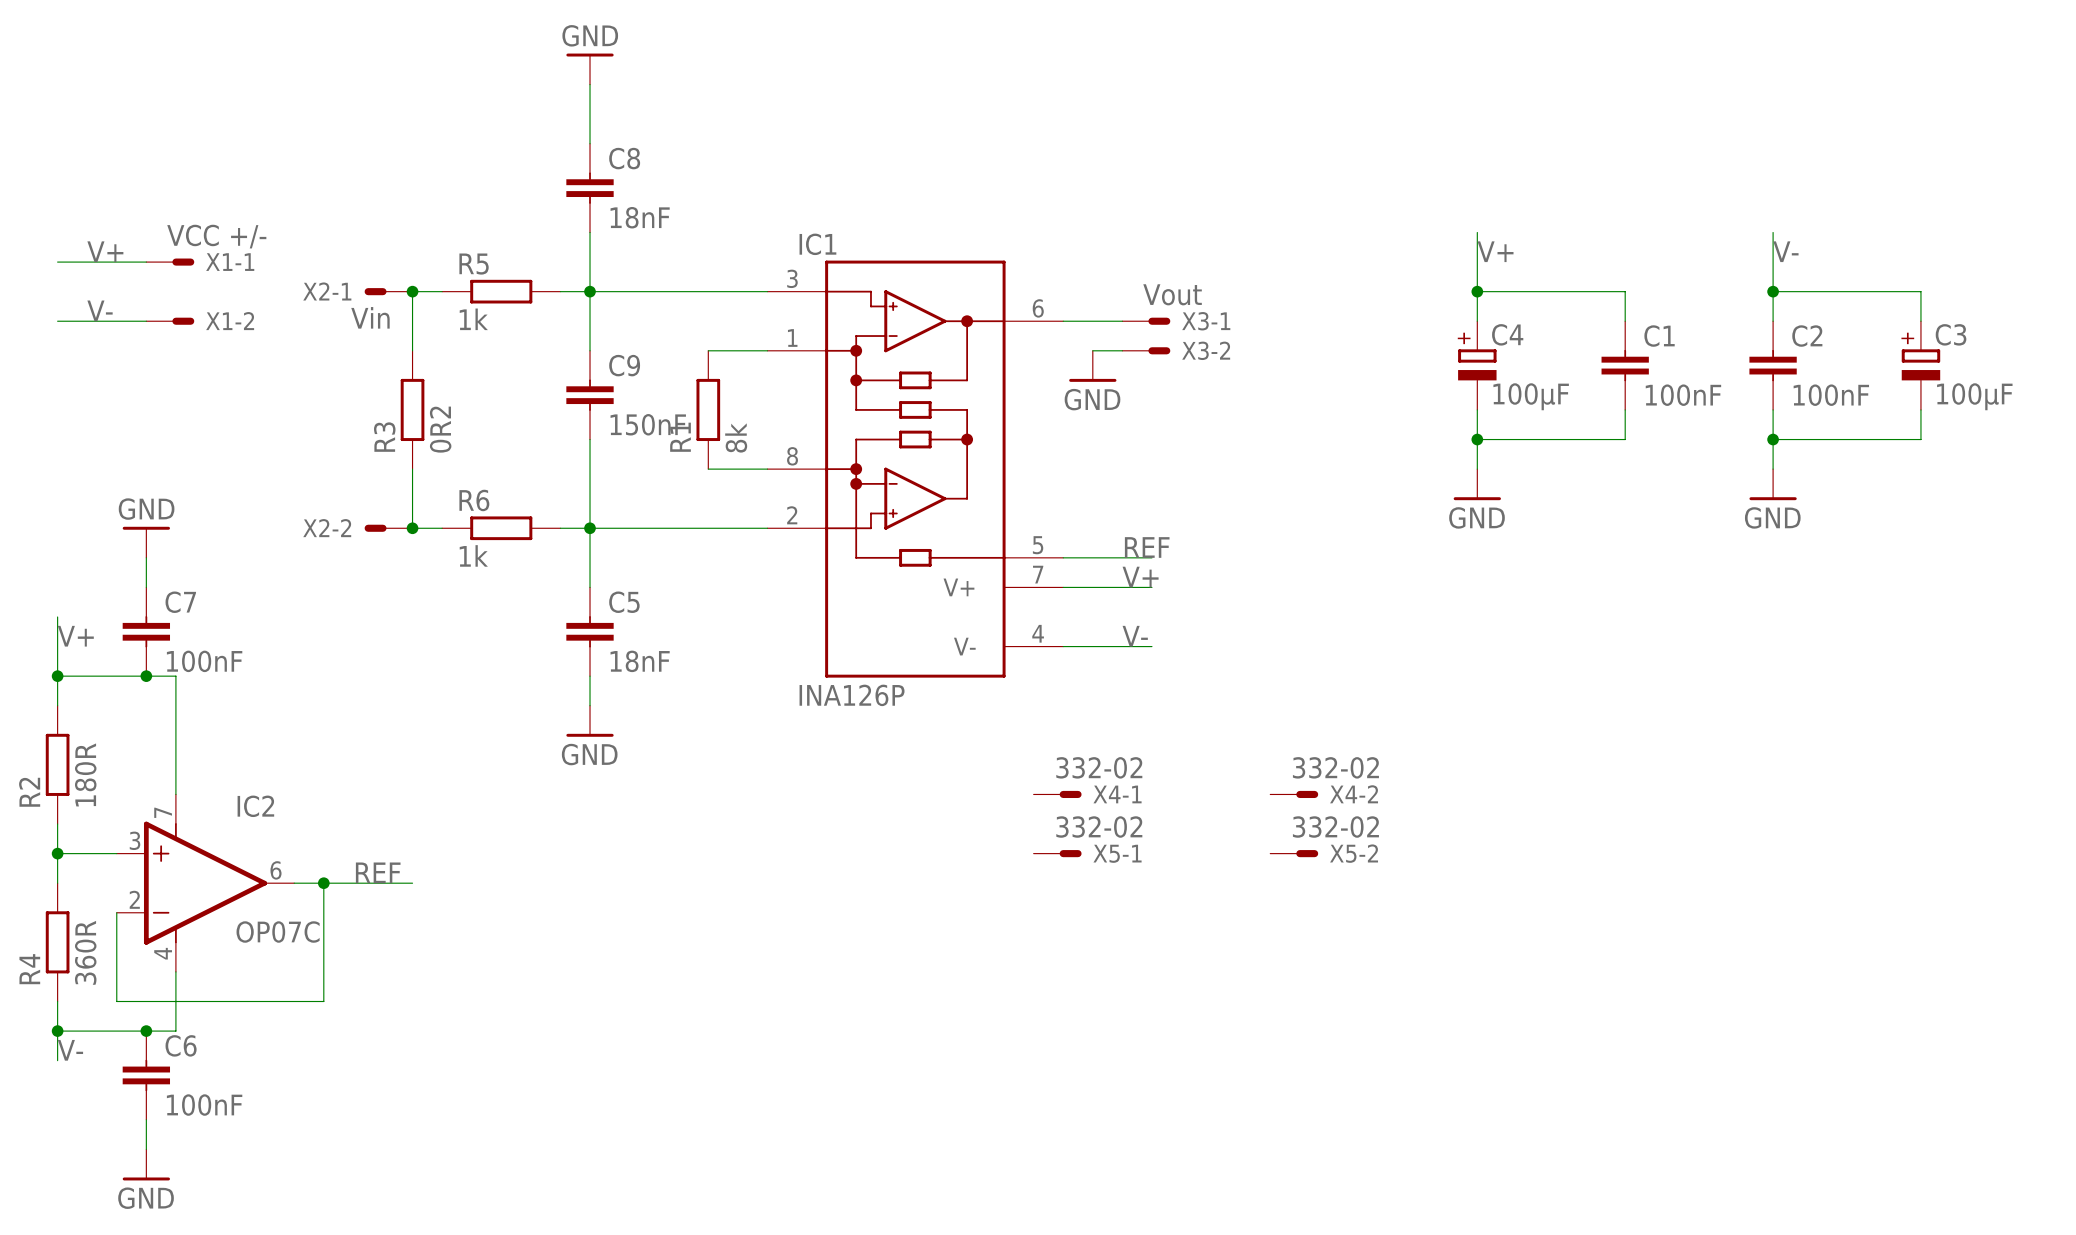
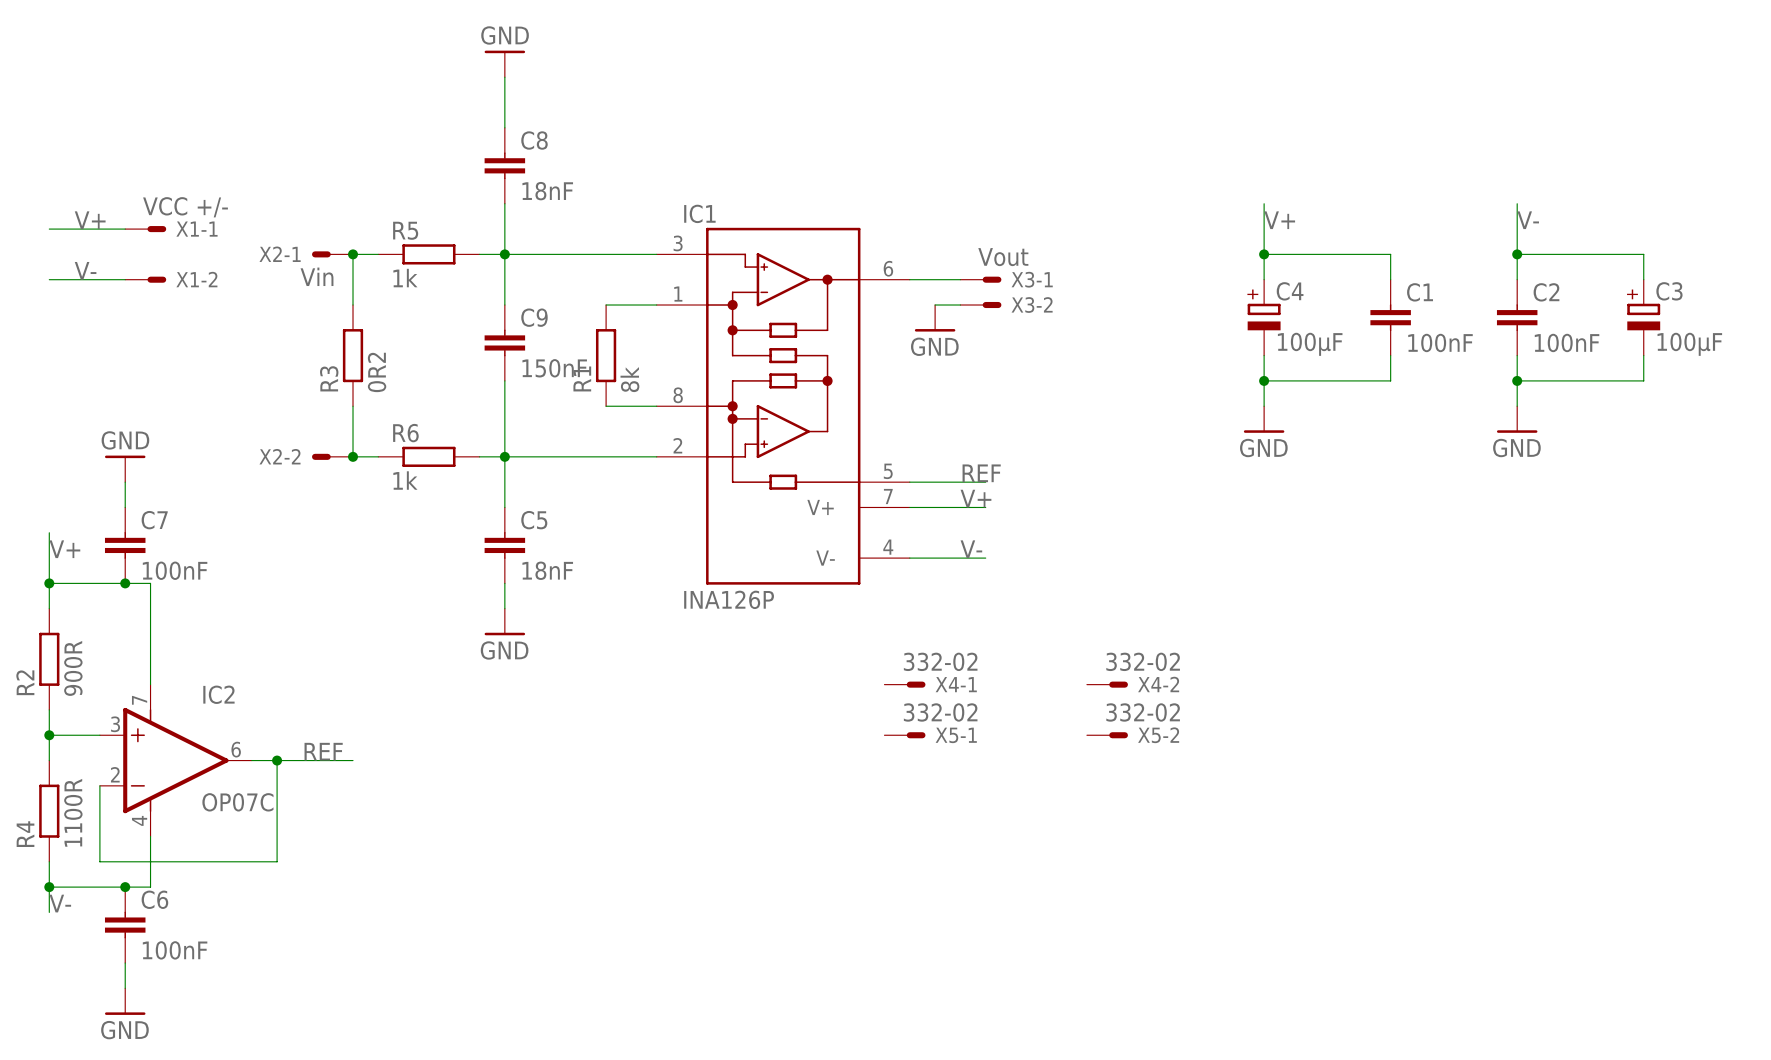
R2 value: 180R (85, 774) -> 900R (73, 668)
R4 value: 360R (85, 952) -> 1100R (73, 812)

